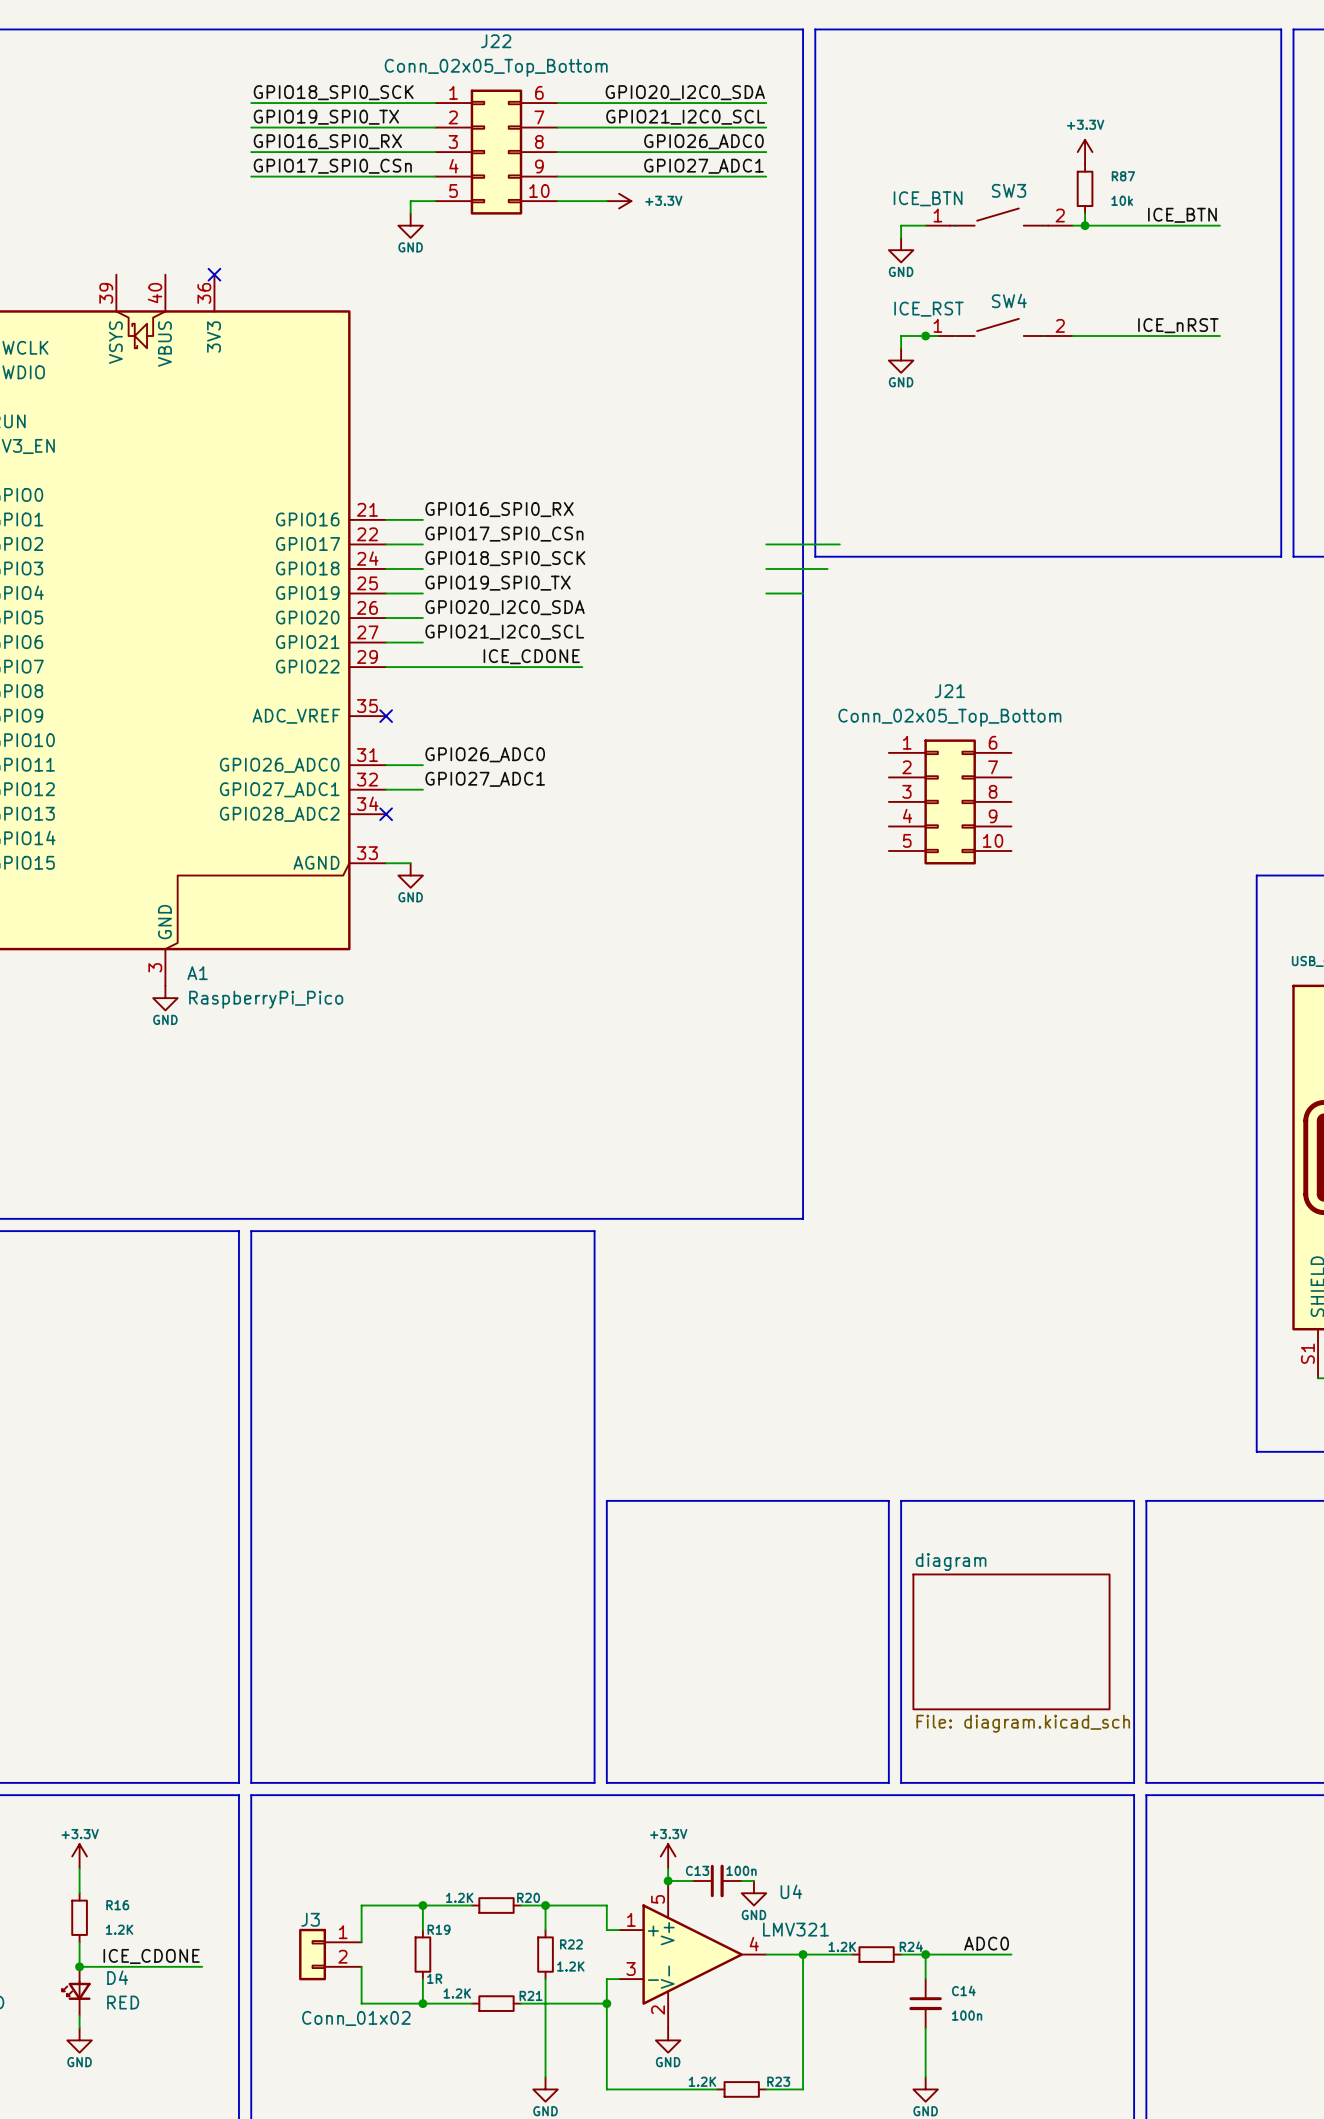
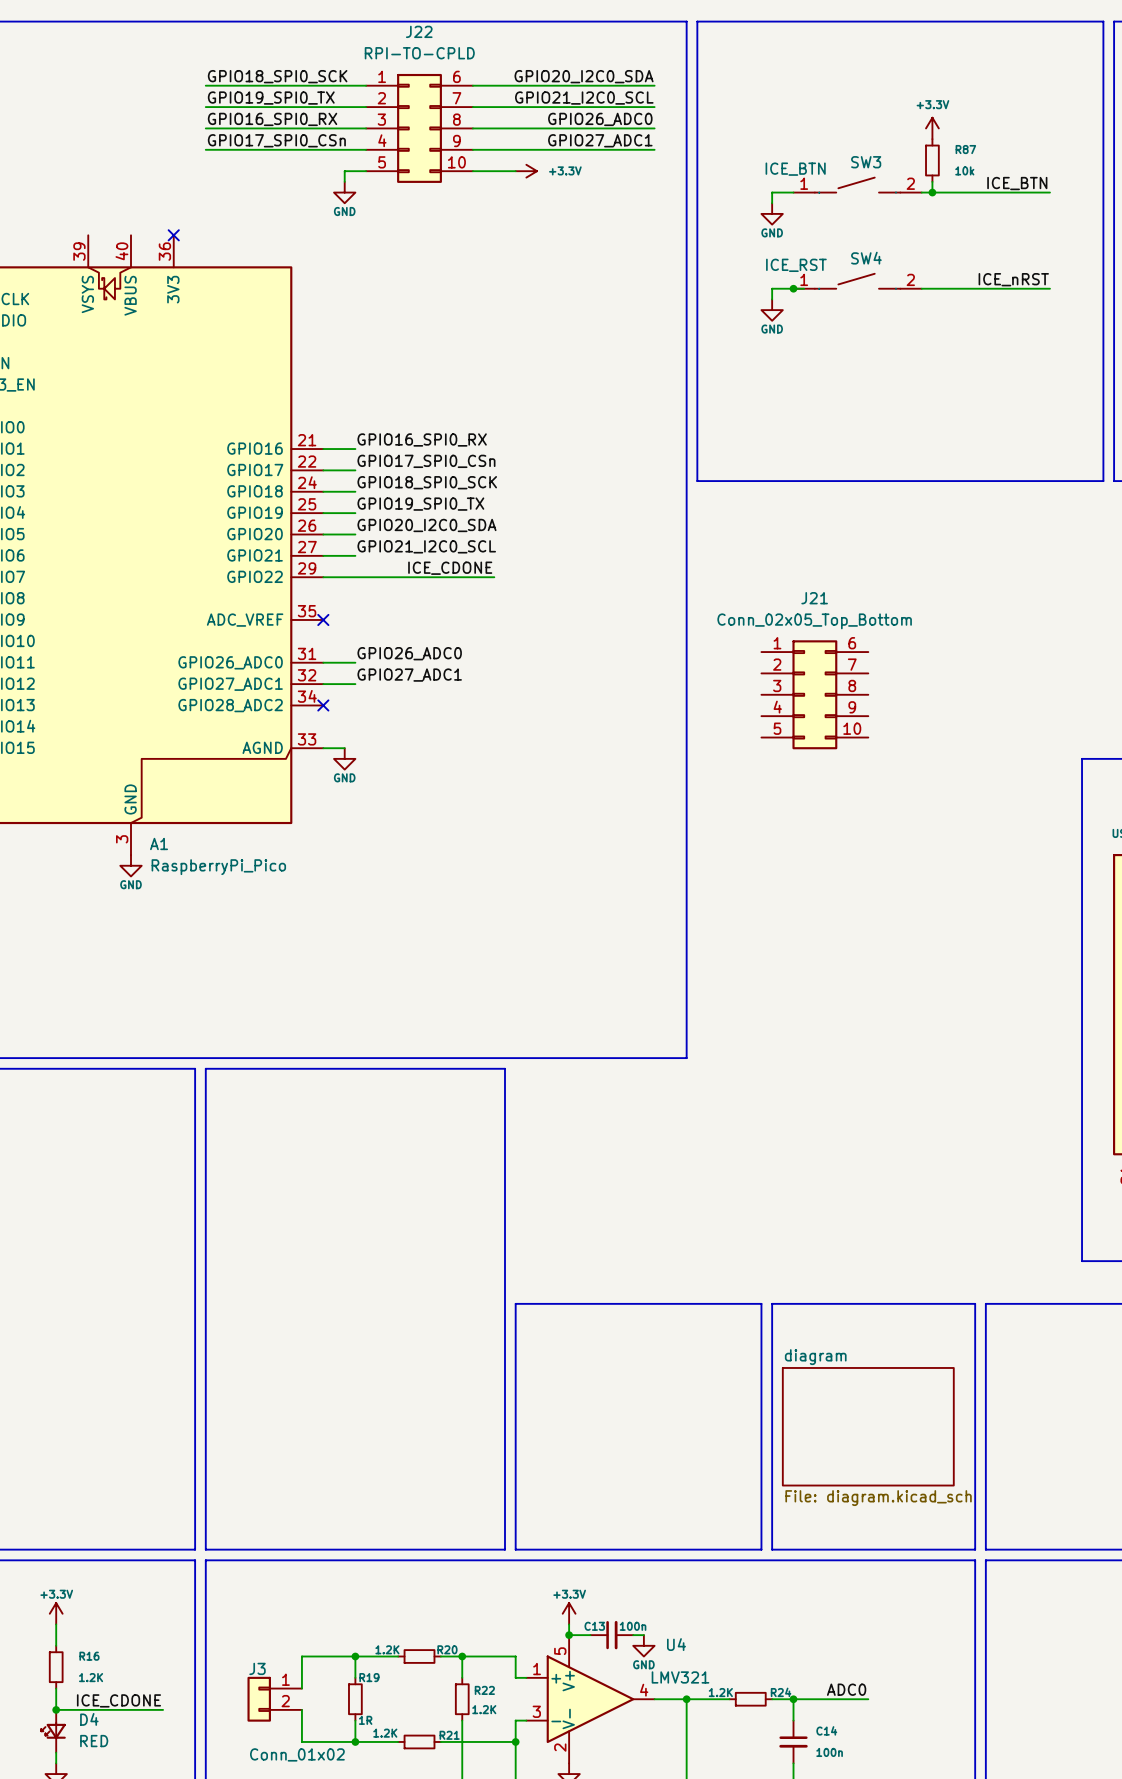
J22 value: Conn_02x05_Top_Bottom (496, 67) -> RPI-TO-CPLD (419, 53)
wire: (766, 544) (839, 544) -> none
wire: (766, 568) (827, 568) -> none
wire: (766, 593) (803, 593) -> none

